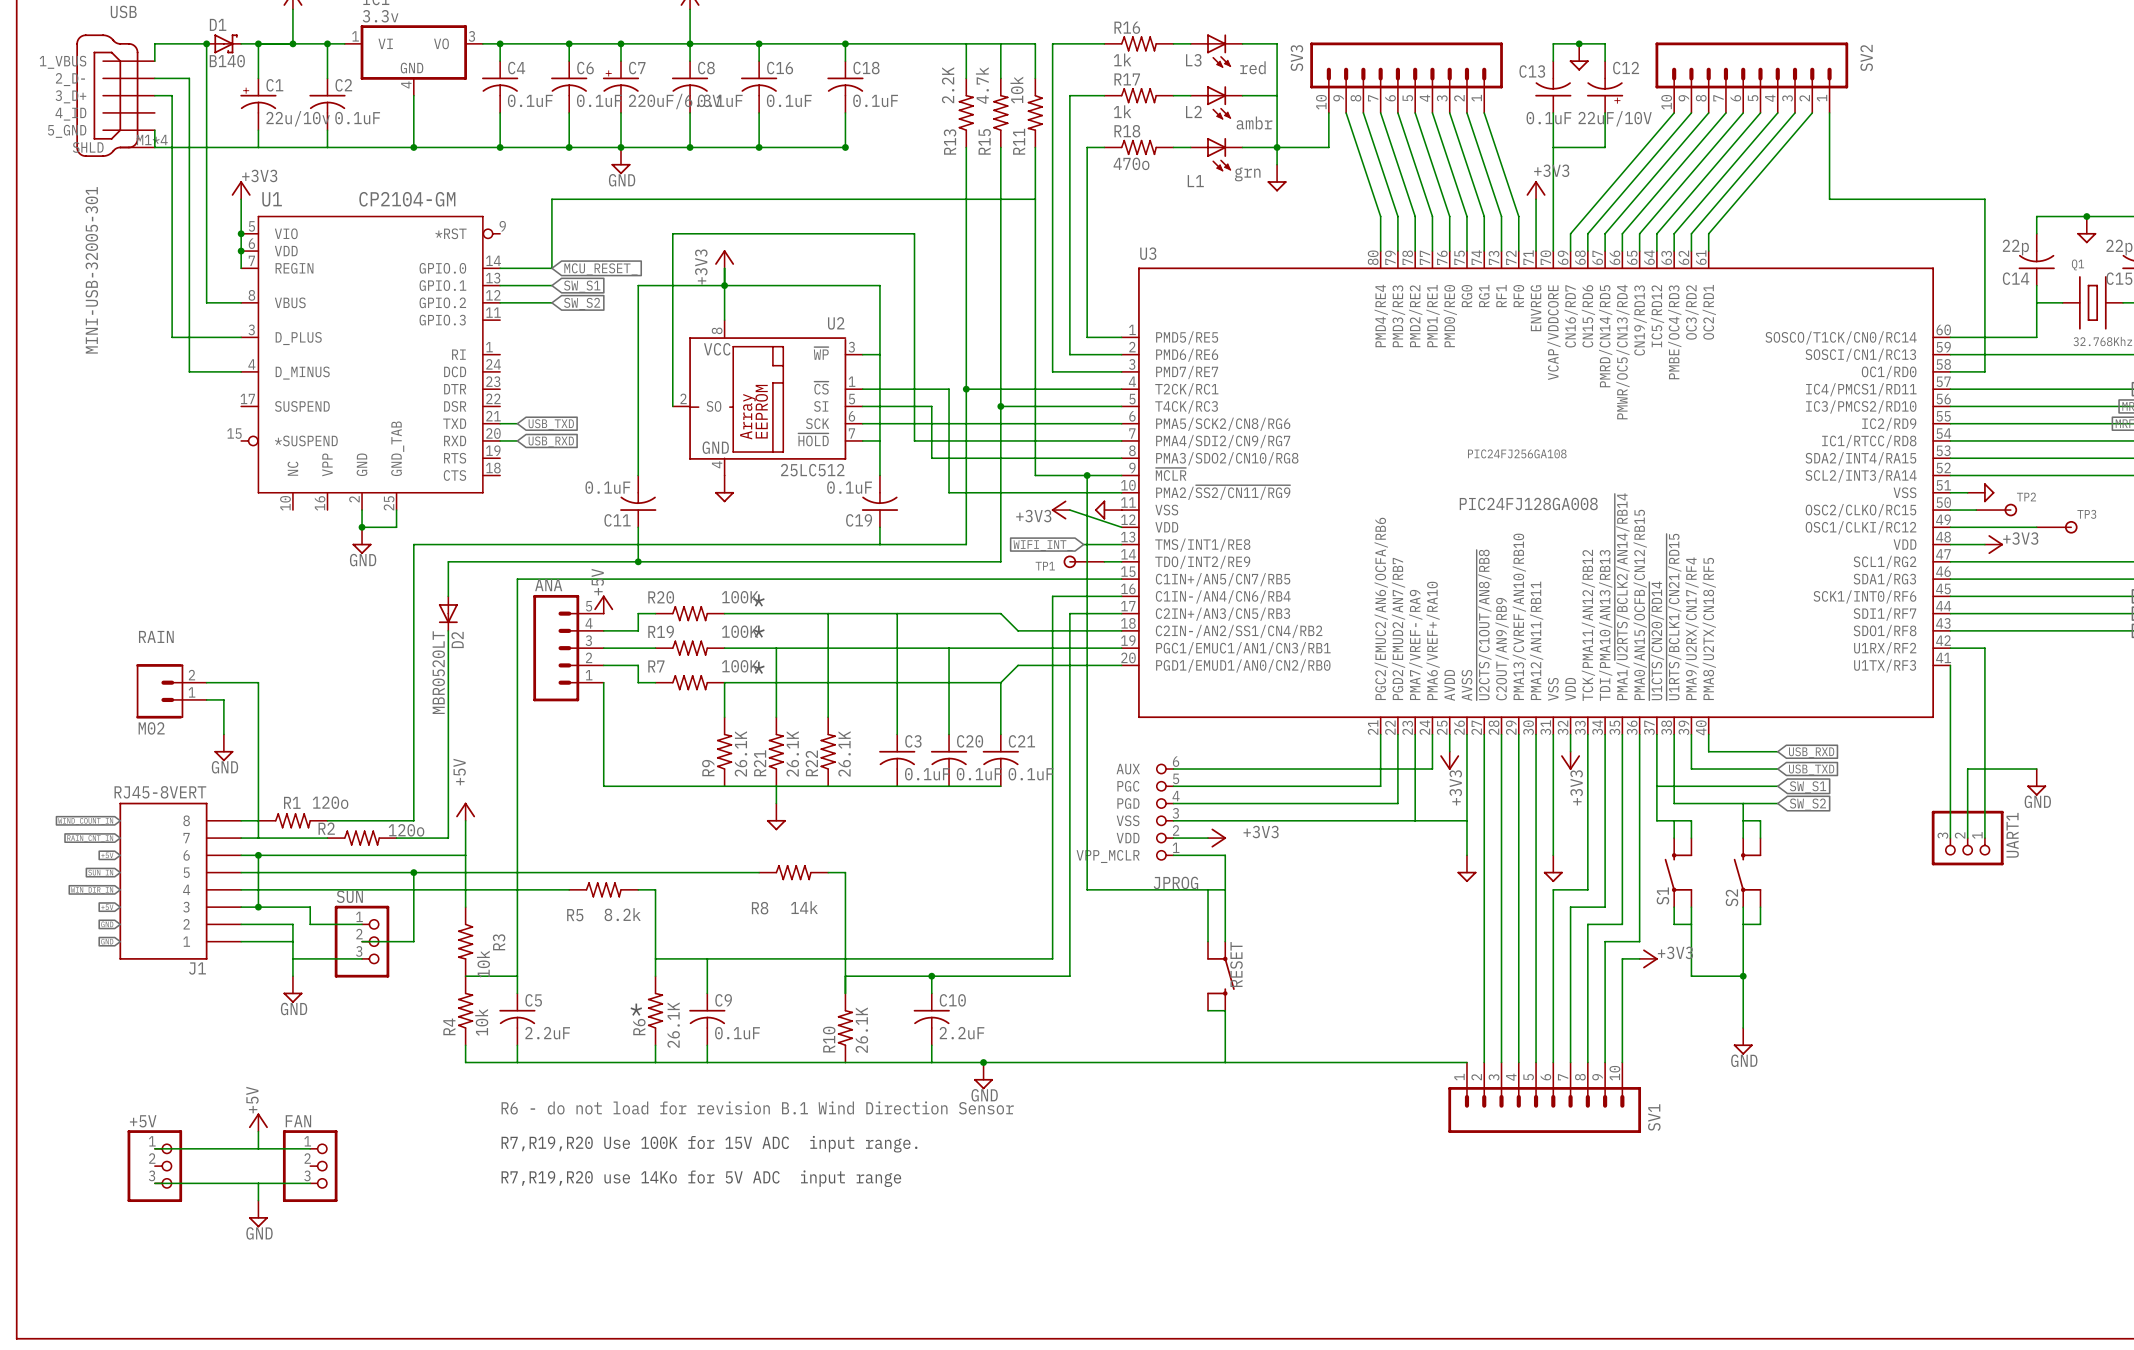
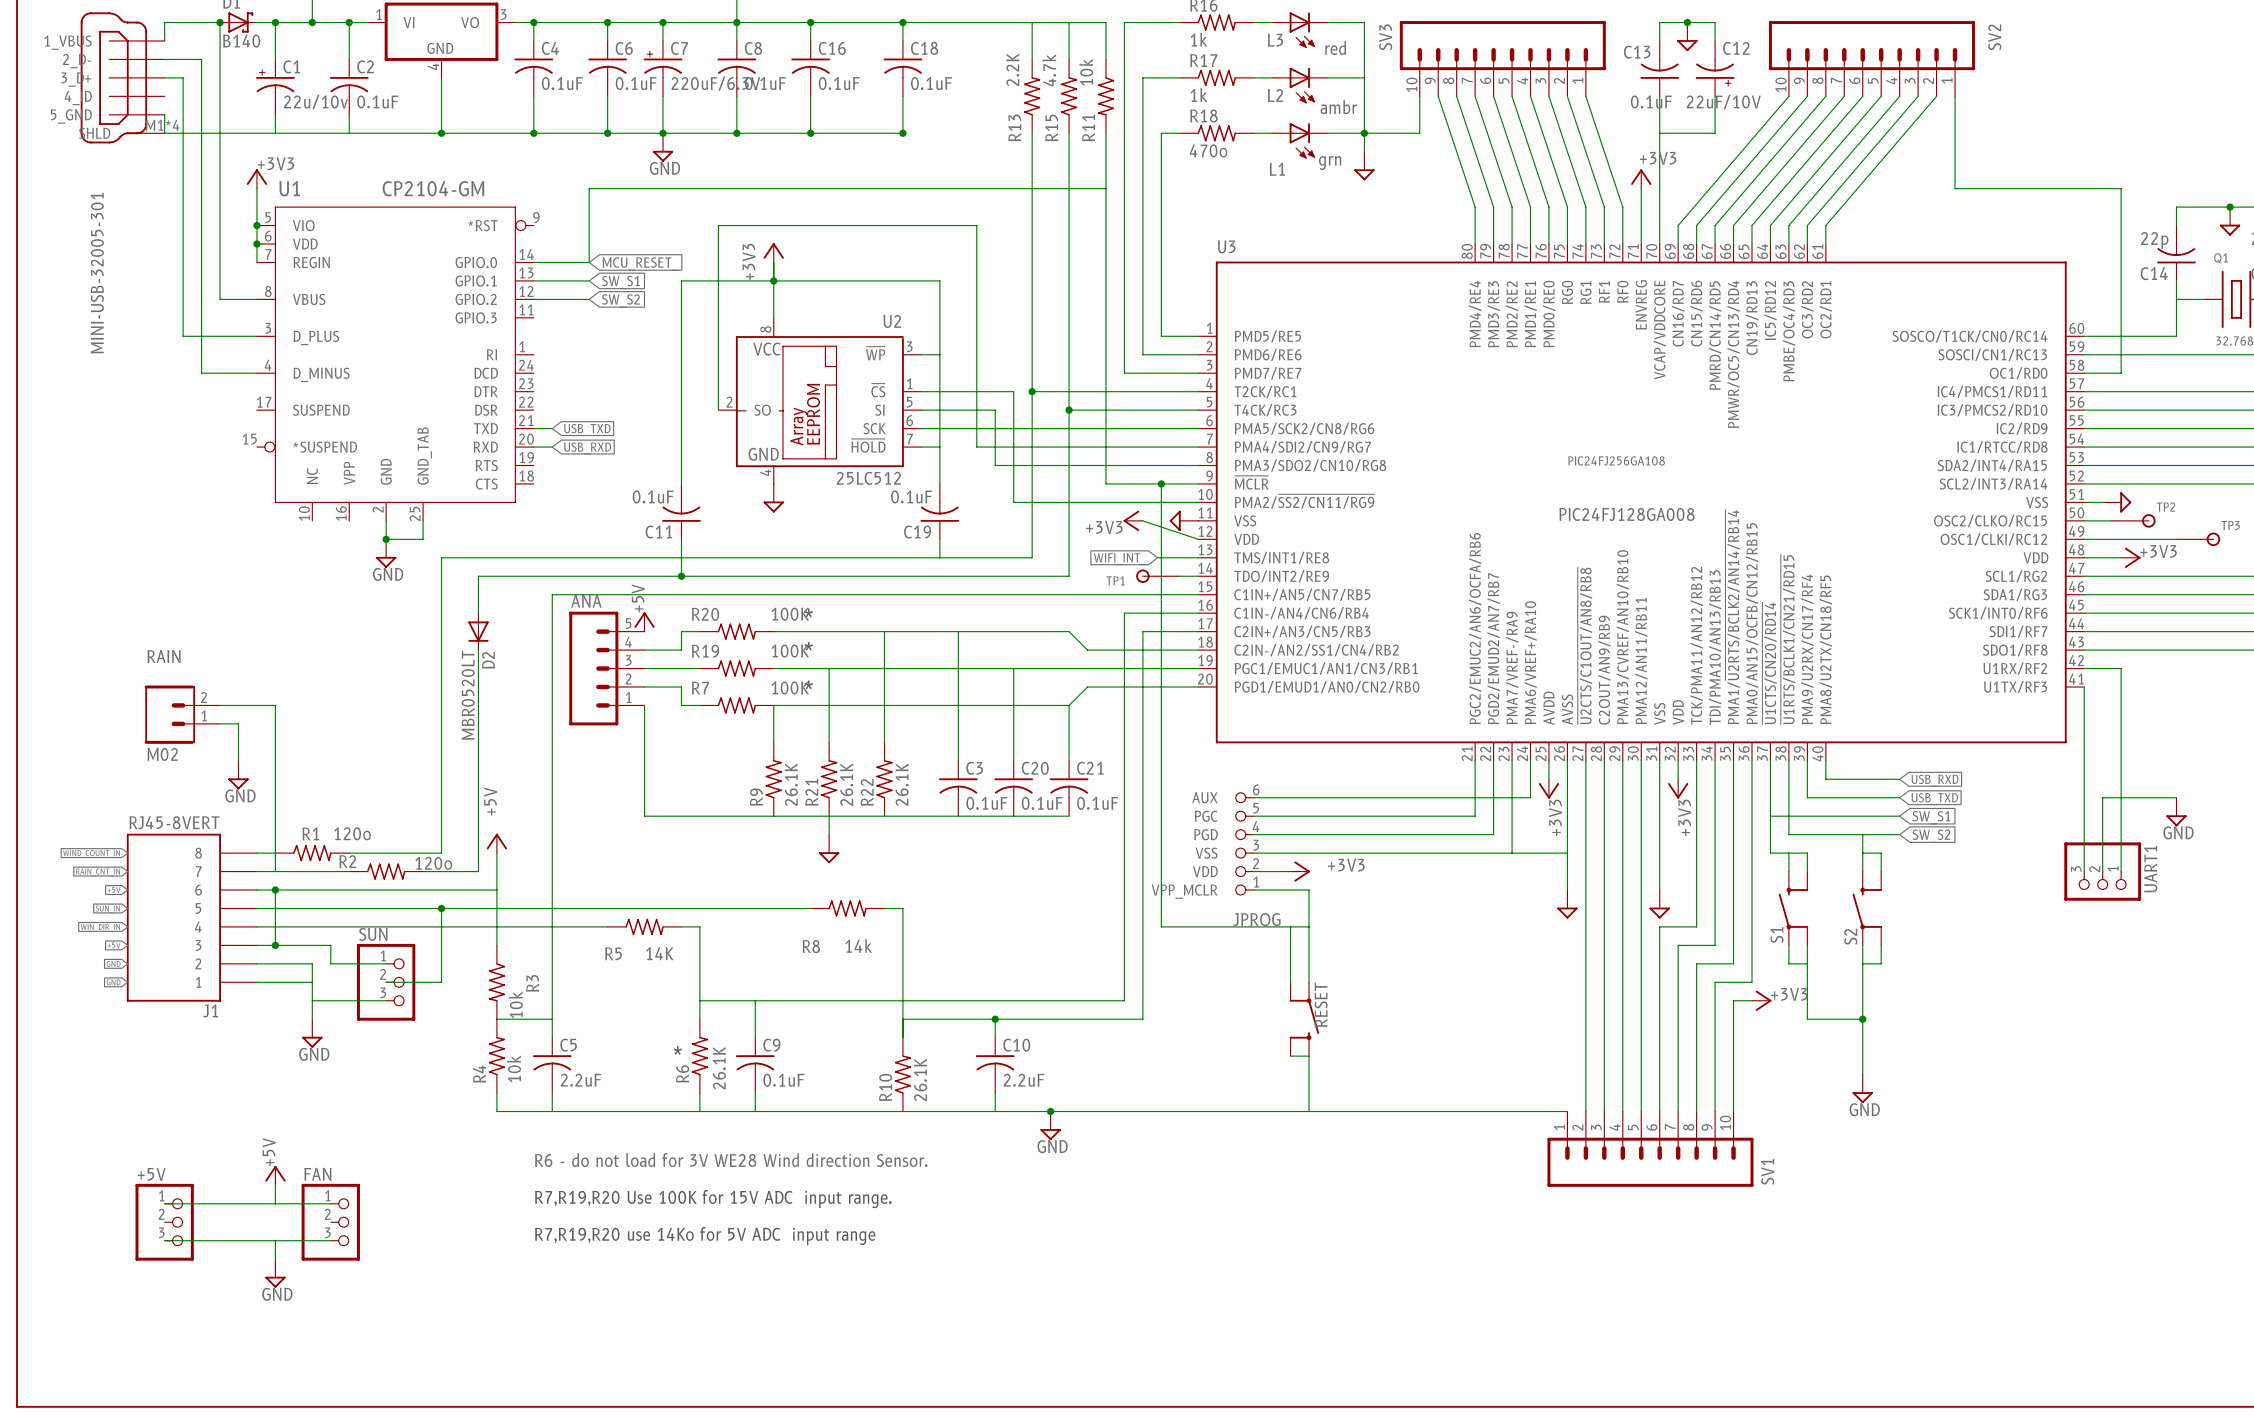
R5 value: 8.2k (622, 914) -> 14K (659, 953)
text: R6 - do not load for revision B.1 Wind Direction Sensor (757, 1107) -> R6 - do not load for 3V WE28 Wind direction Sensor. (731, 1160)

